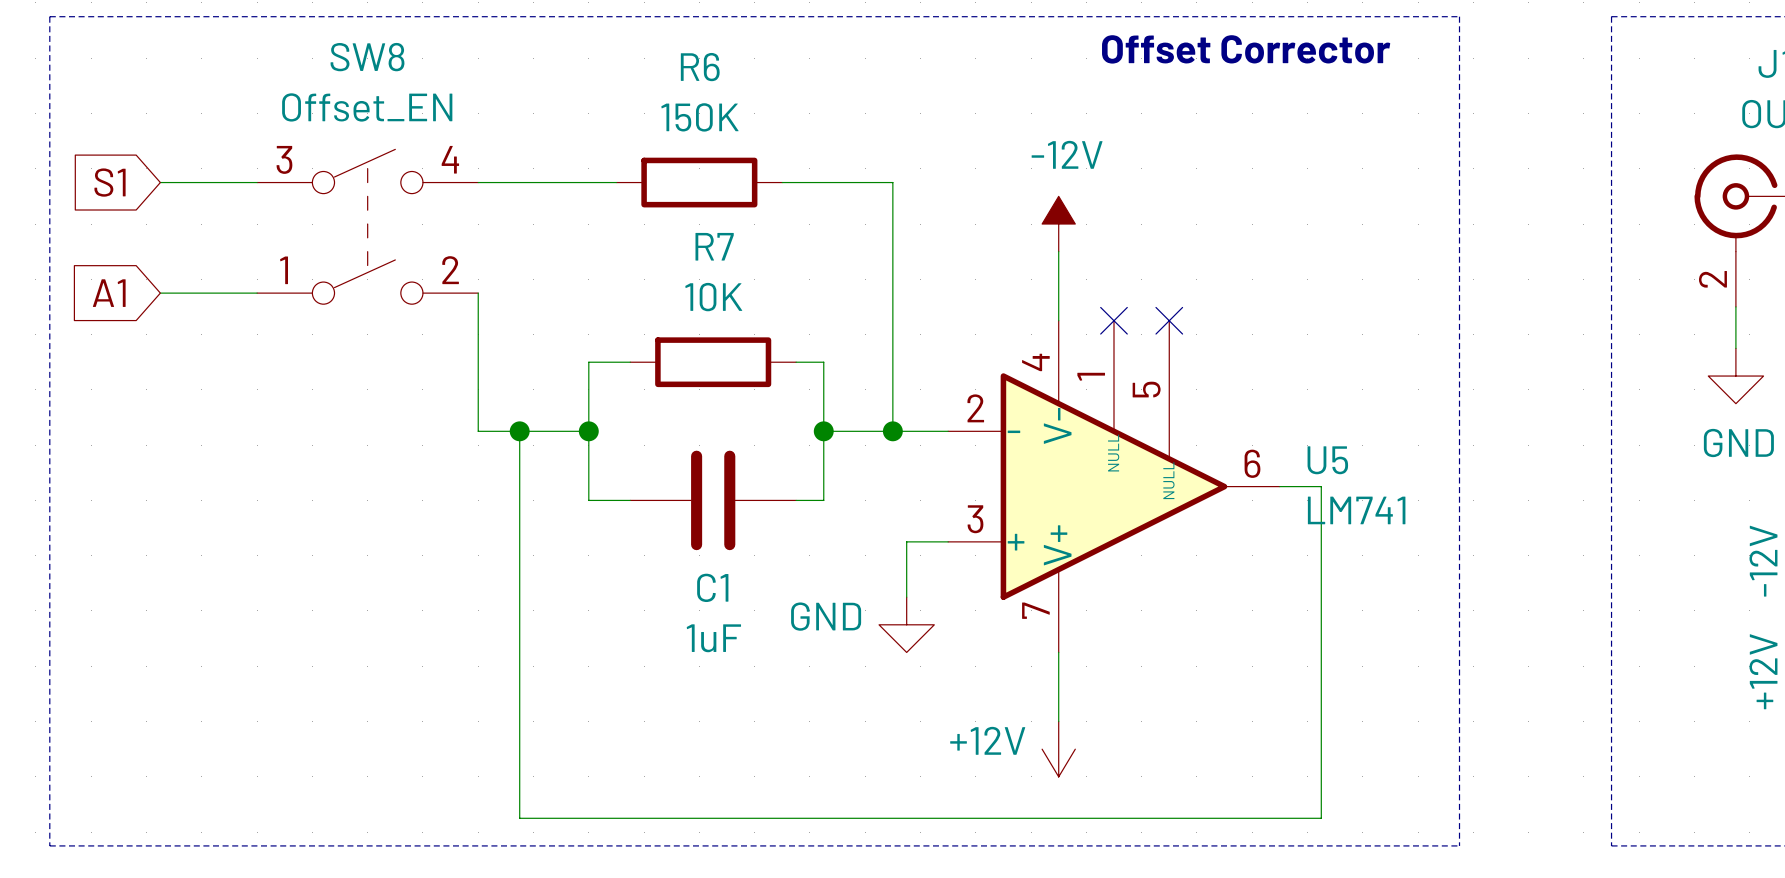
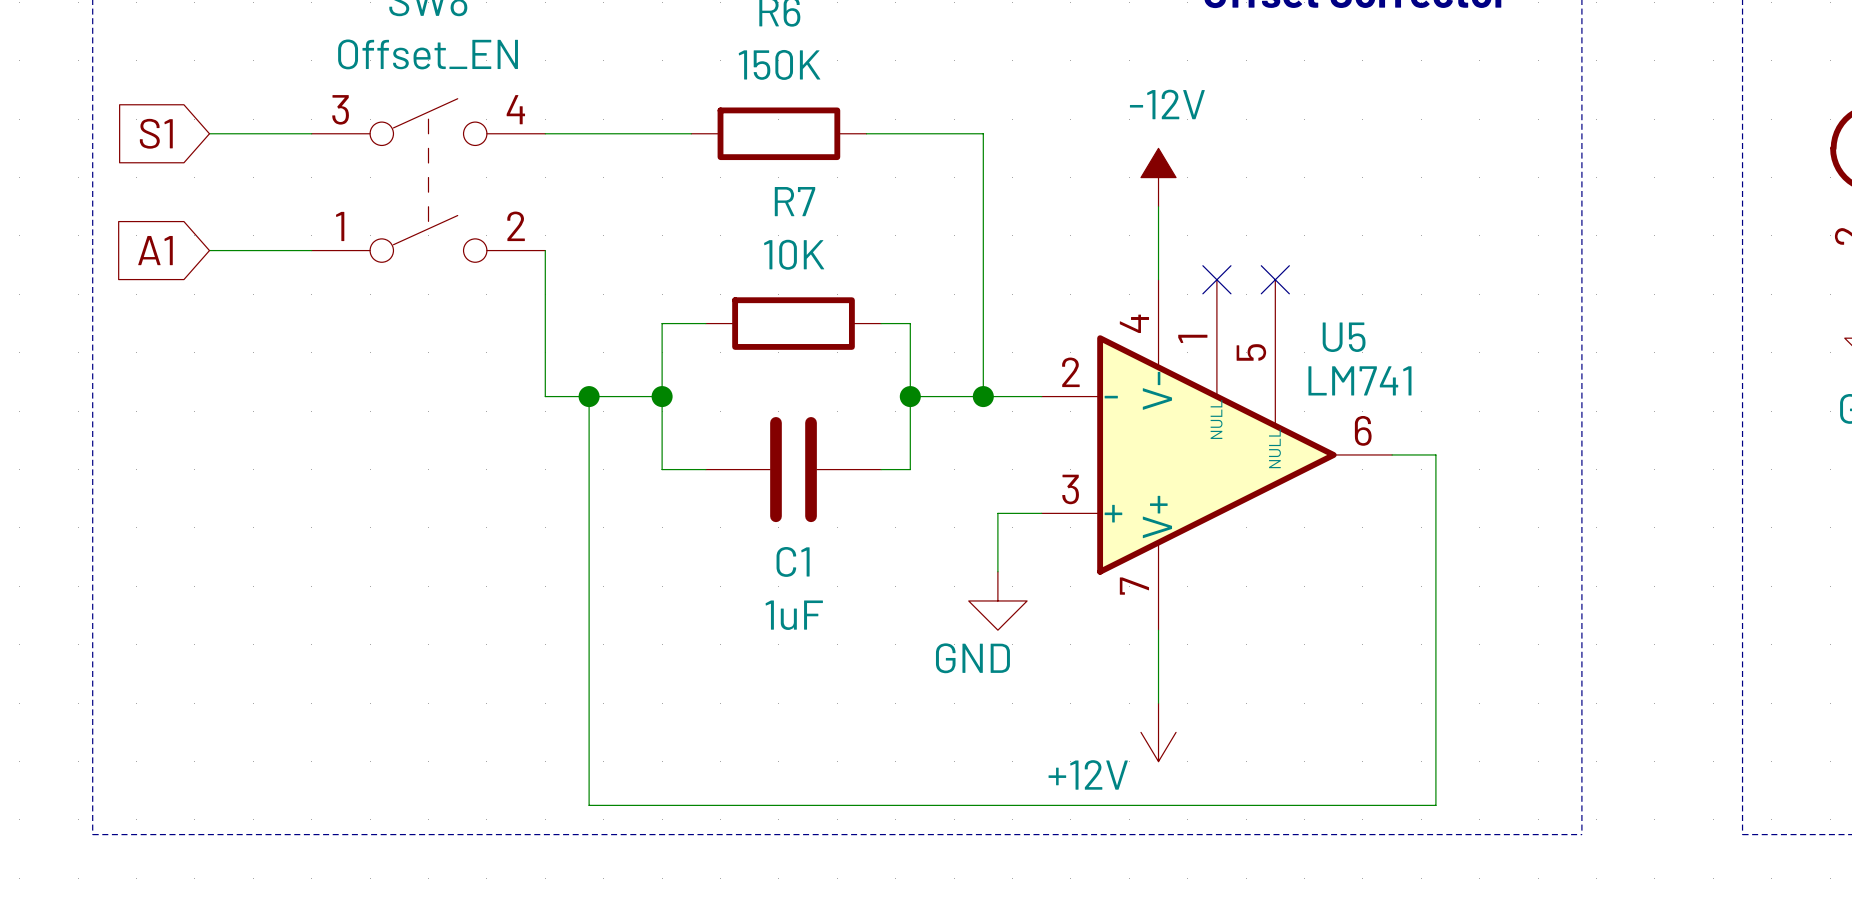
U5 name position: U5 (1327, 460) -> U5 (1344, 337)
U5 value position: LM741 (1356, 510) -> LM741 (1359, 380)
power symbol text position: GND (826, 616) -> GND (972, 658)
power symbol text position: +12V (987, 740) -> +12V (1088, 774)

